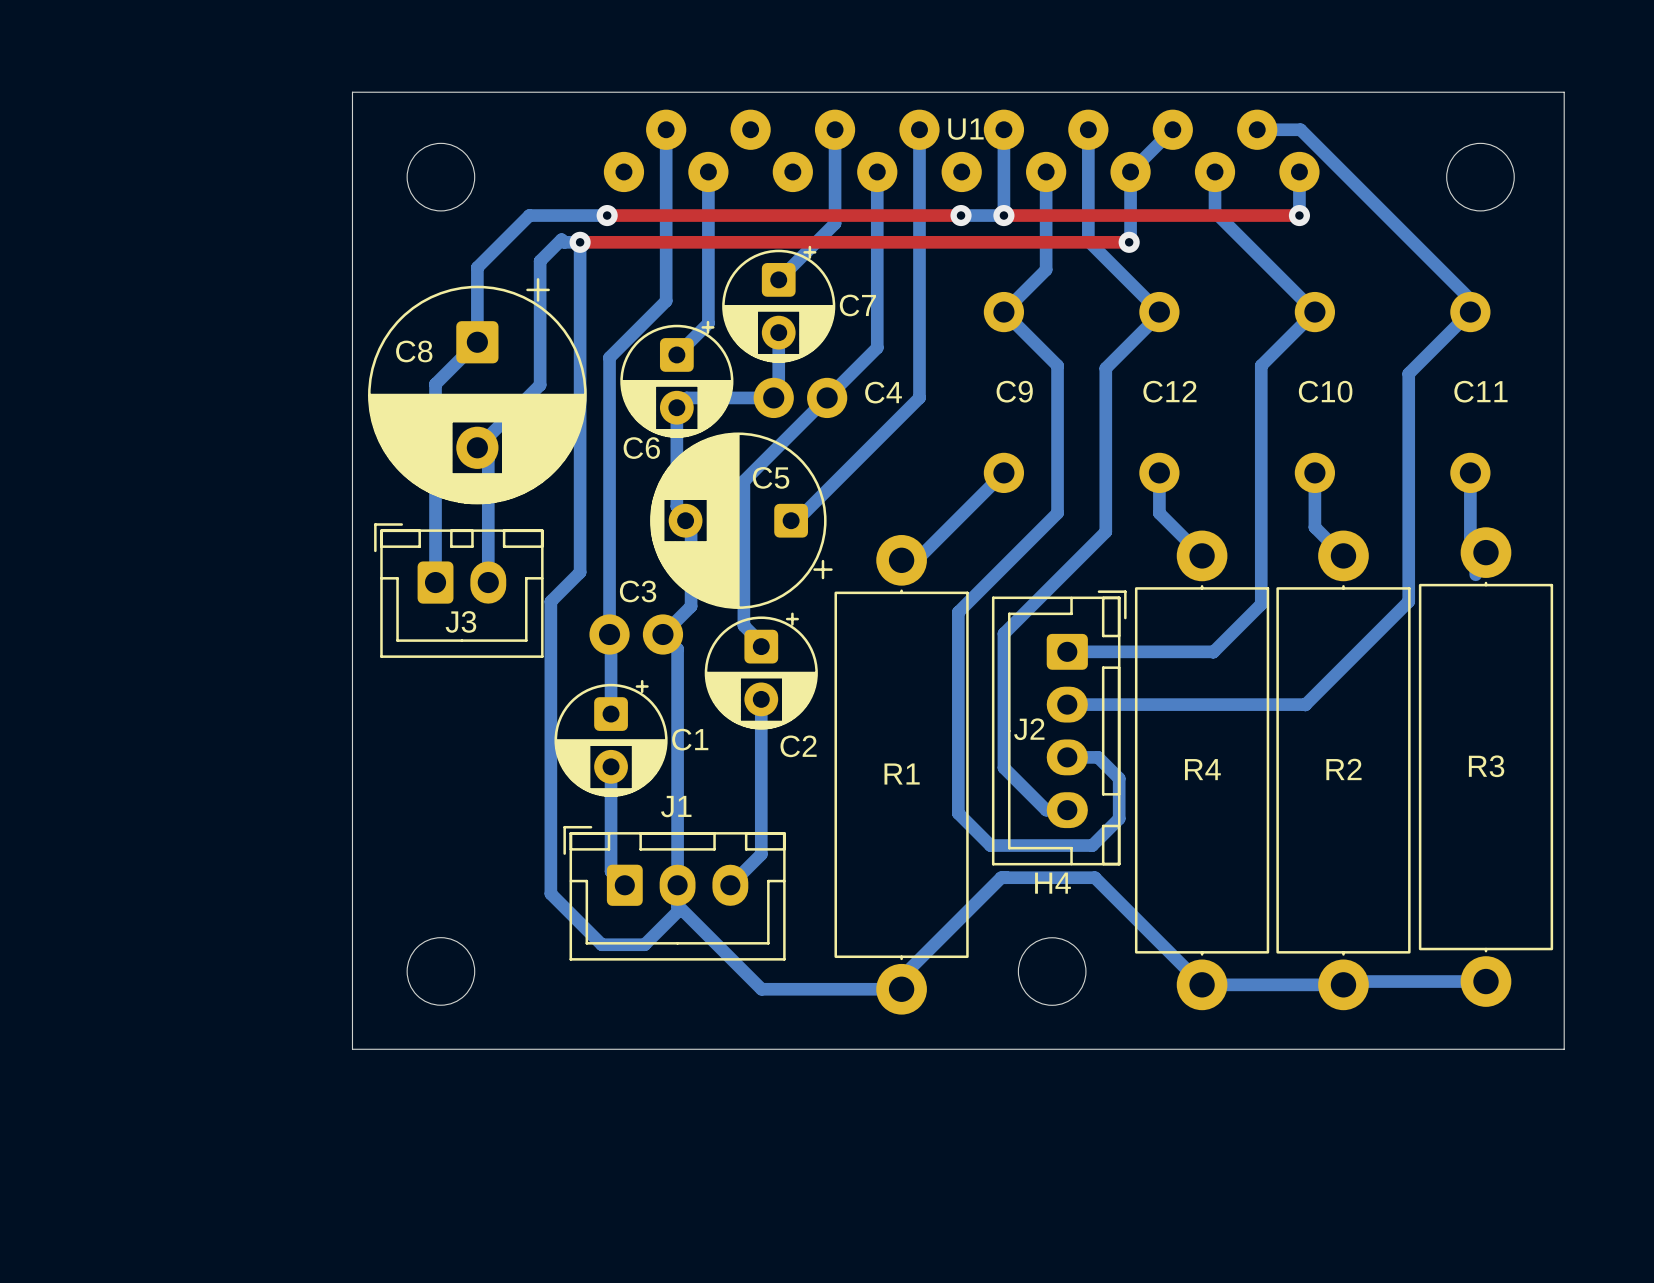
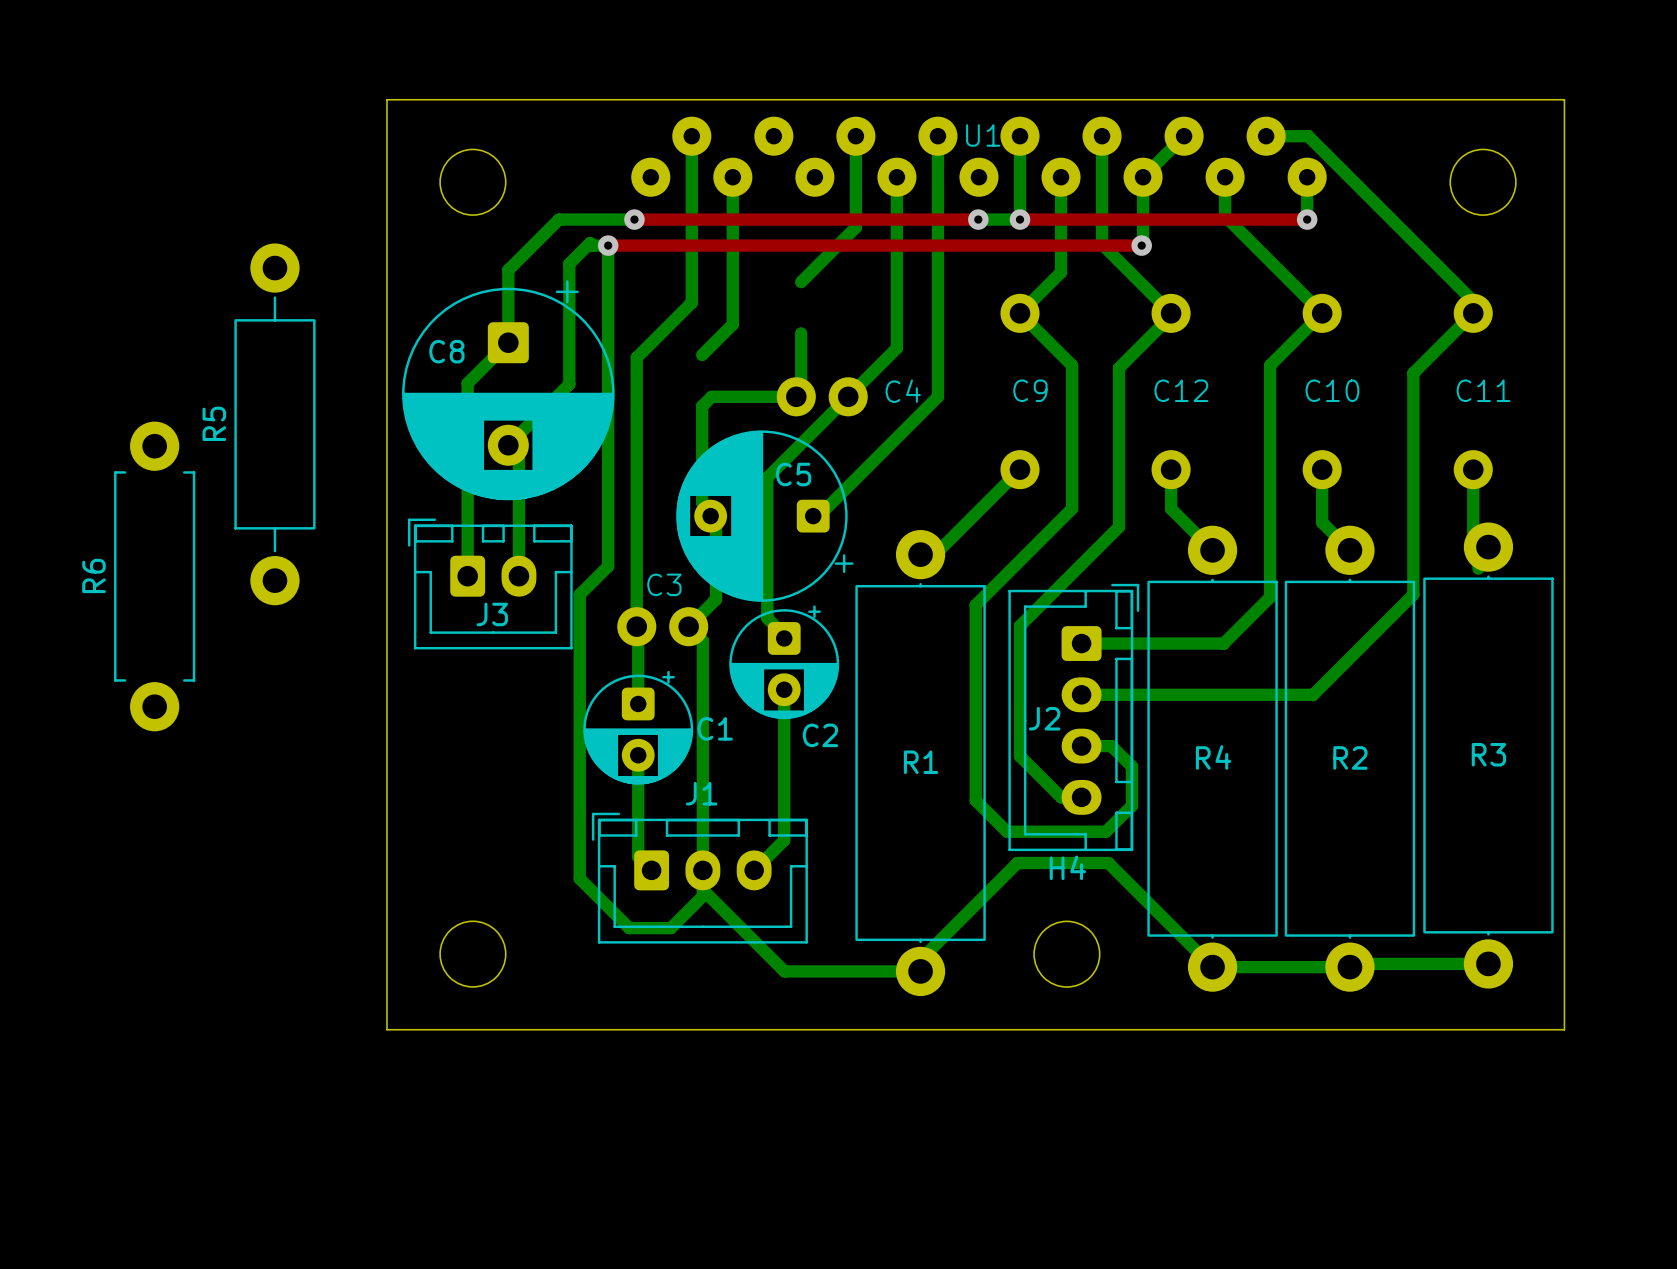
C7: (778, 304) -> none
C6: (676, 379) -> none
R5: none -> (274, 424)
R6: none -> (154, 576)

